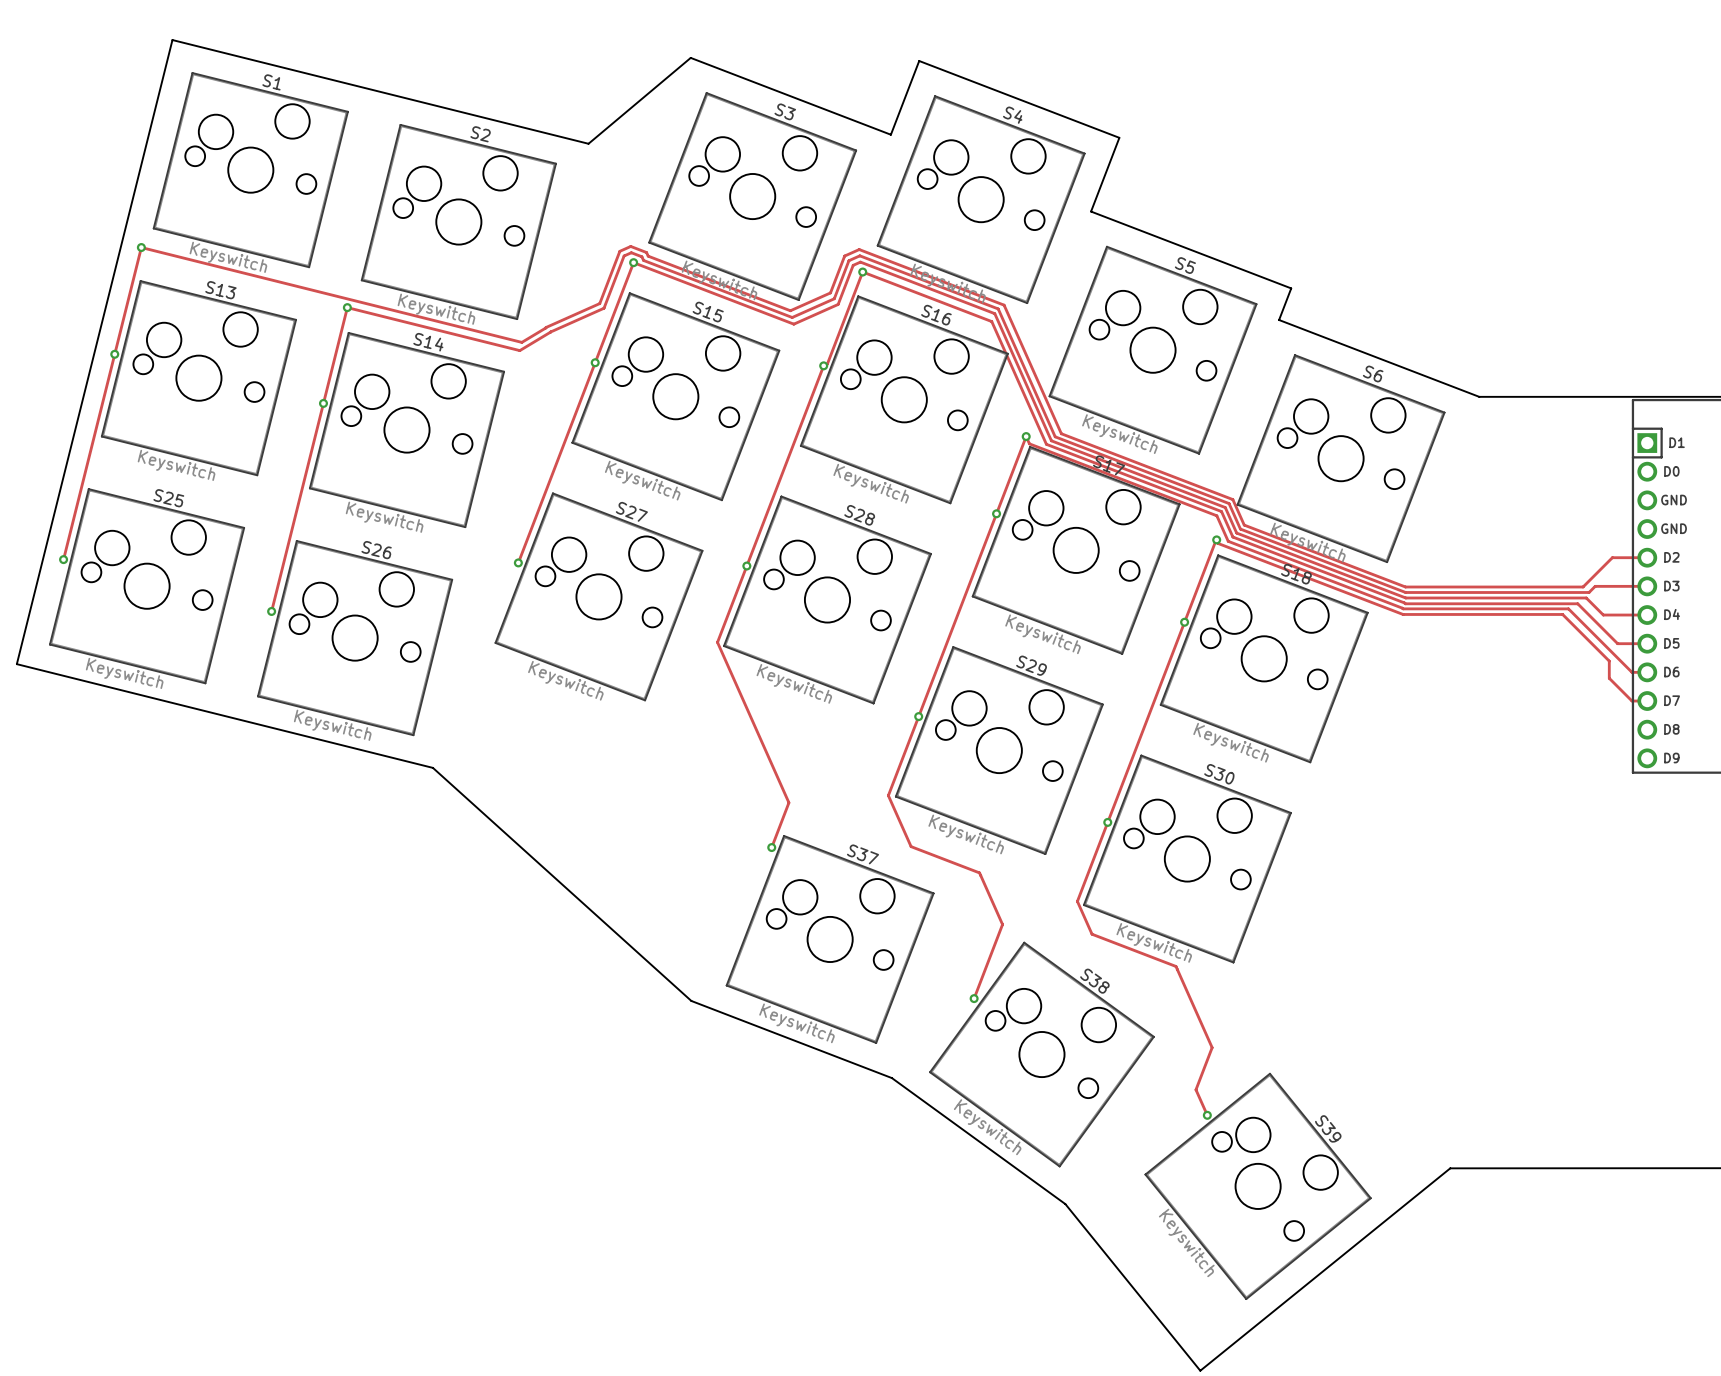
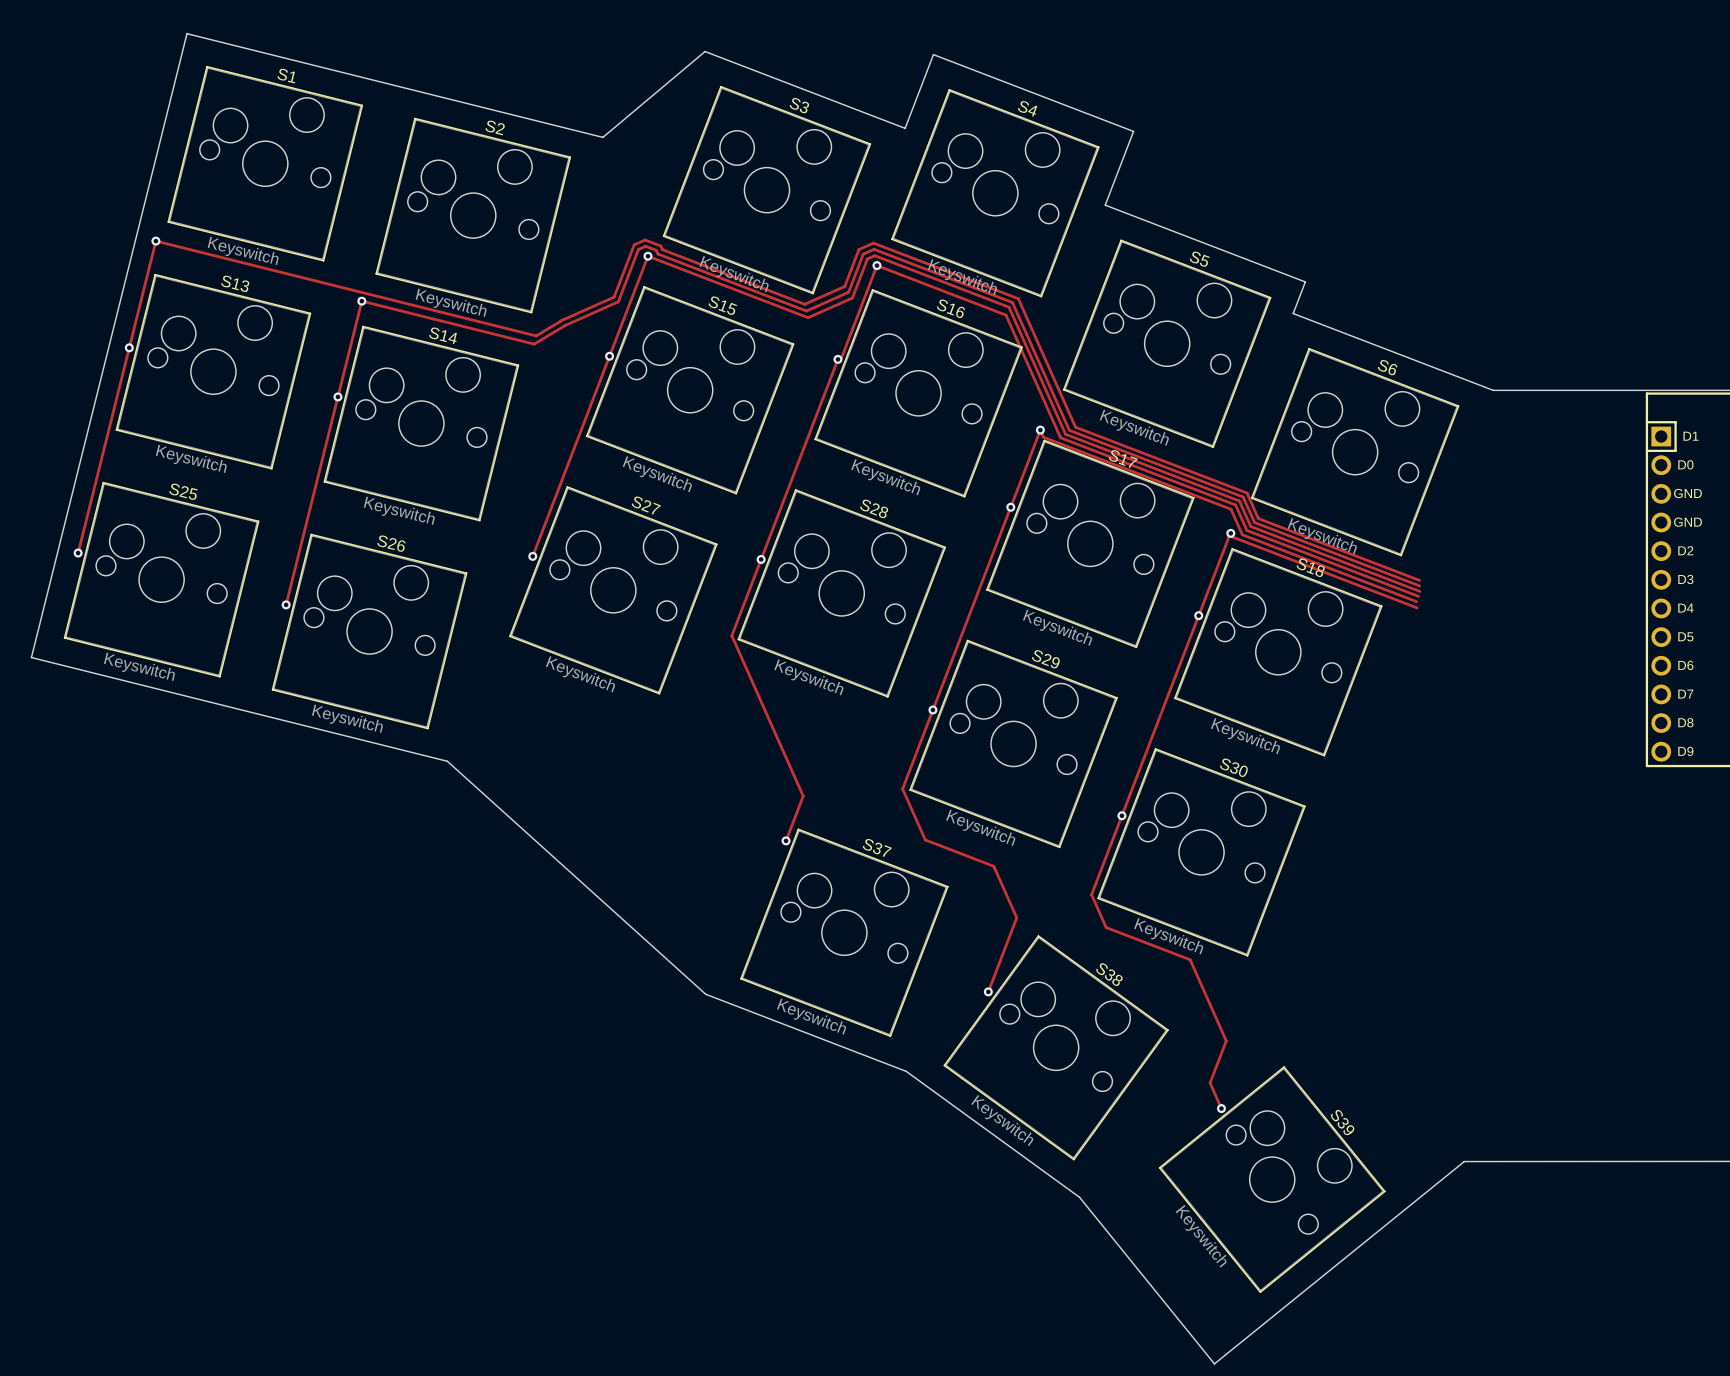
track: (1647, 557) (1612, 557) (1583, 587) (1405, 587) -> none
track: (1647, 586) (1595, 586) (1589, 592) (1405, 592) -> none
track: (1405, 597) (1586, 597) (1603, 615) (1647, 615) -> none
track: (1404, 602) (1577, 603) (1617, 643) (1647, 643) -> none
track: (1402, 608) (1568, 608) (1632, 672) (1647, 672) -> none
track: (1403, 614) (1562, 614) (1609, 661) (1609, 678) (1632, 701) (1647, 701) -> none

